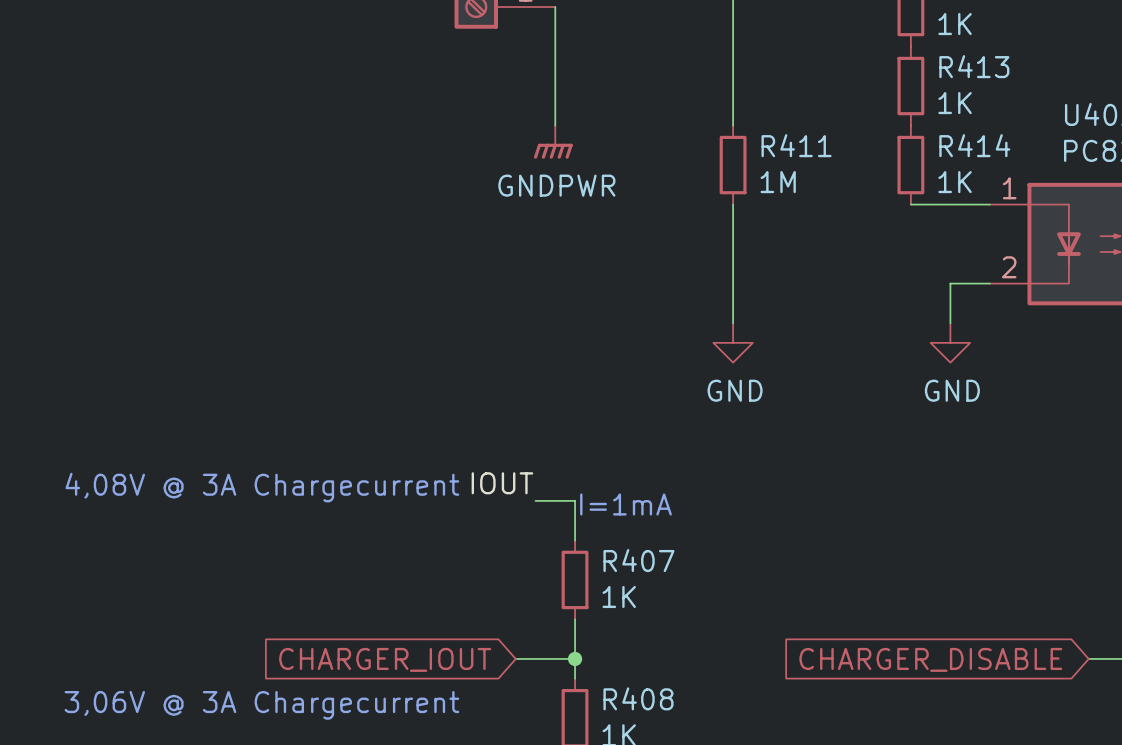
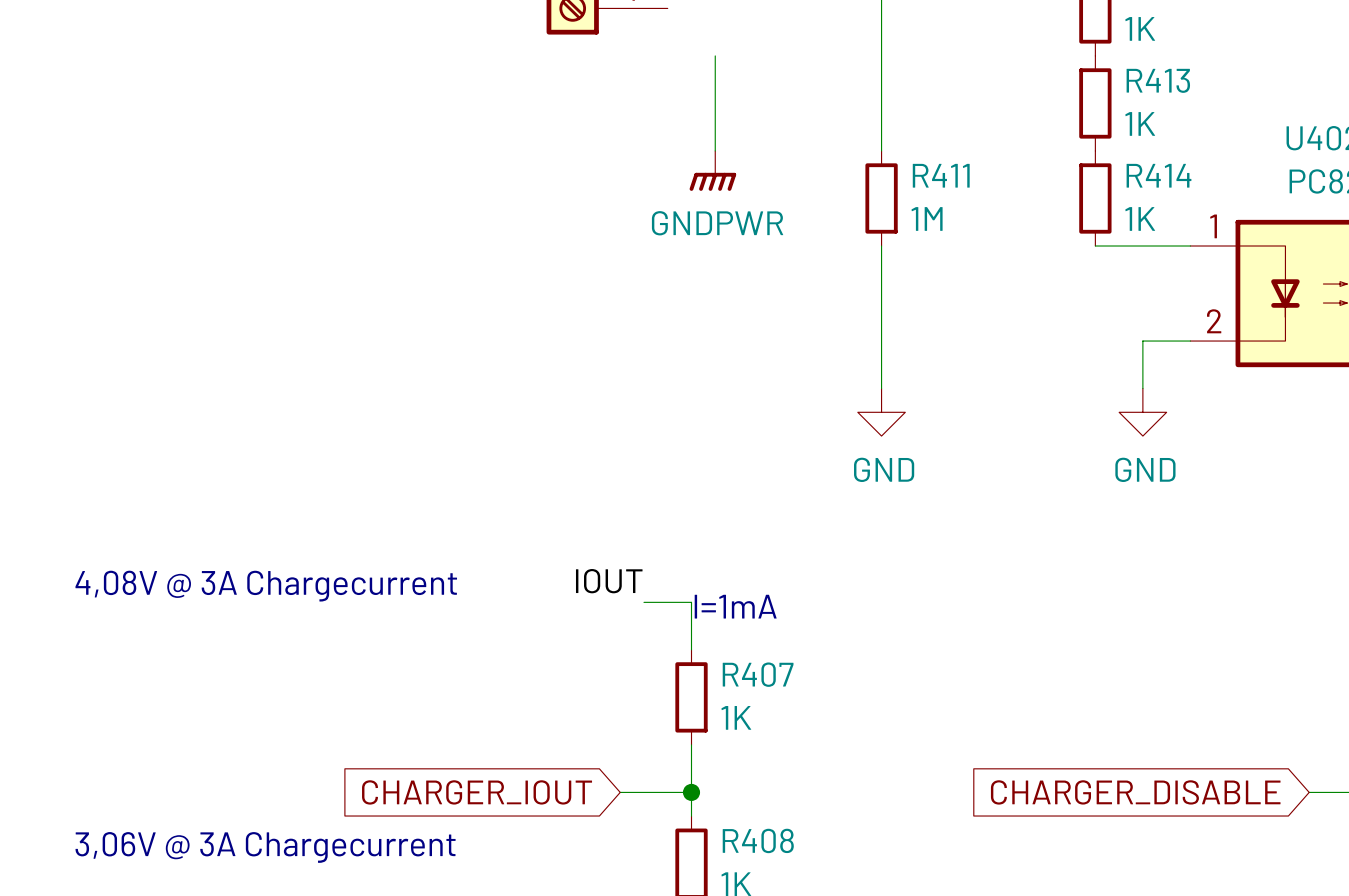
wire: (555, 7) (555, 125) -> none
wire: none -> (715, 55) (715, 150)
power symbol position: GNDPWR (553, 142) -> GNDPWR (712, 170)

